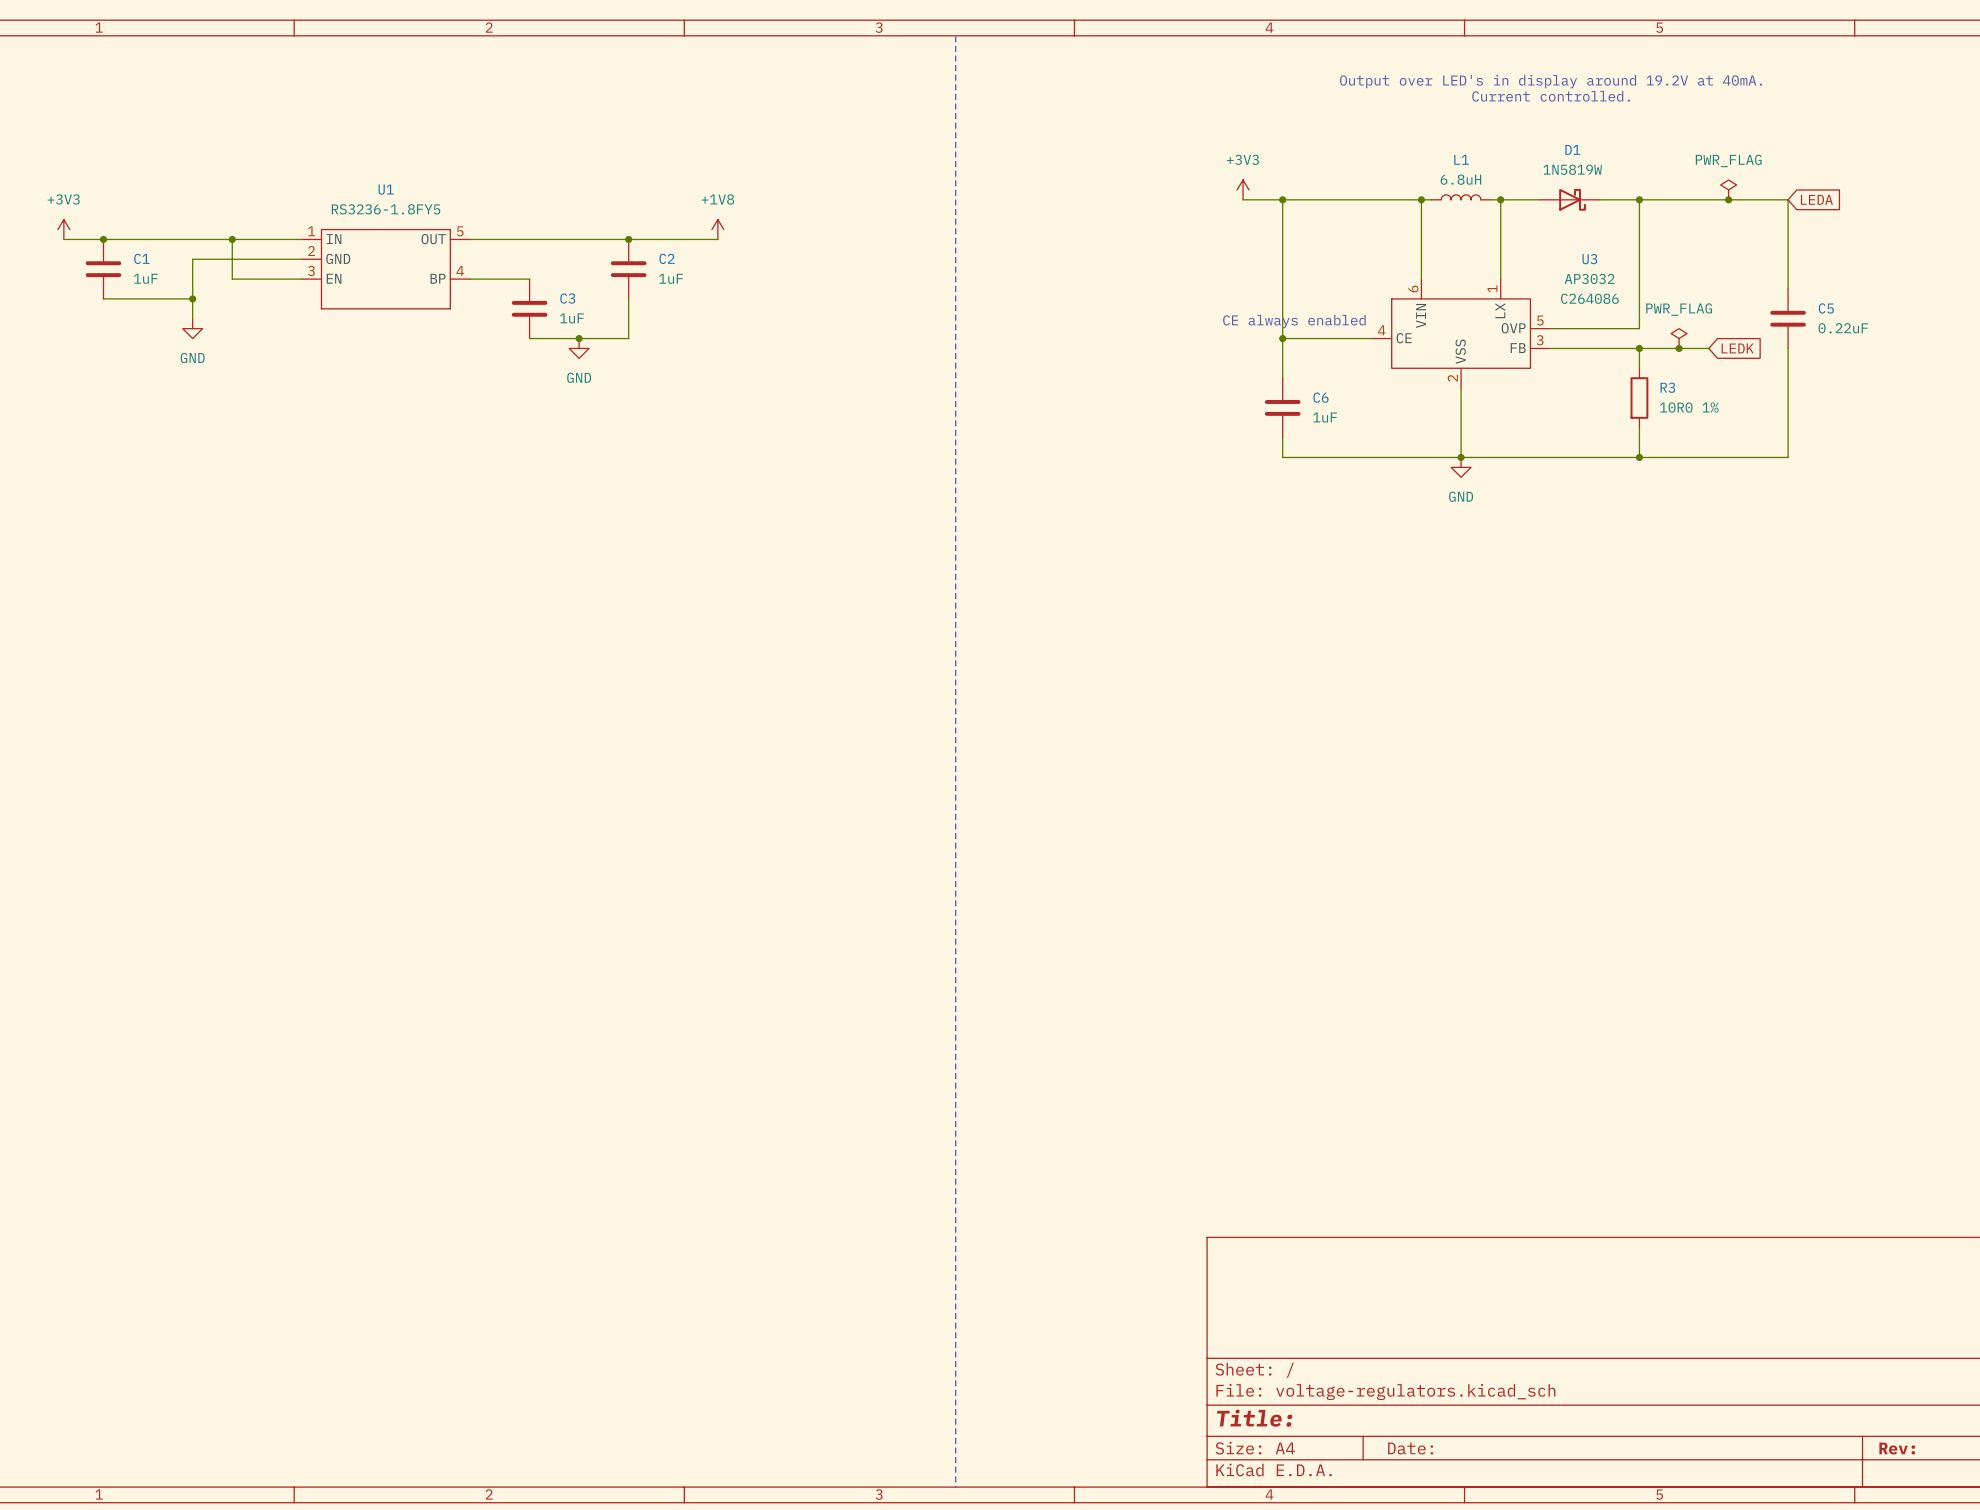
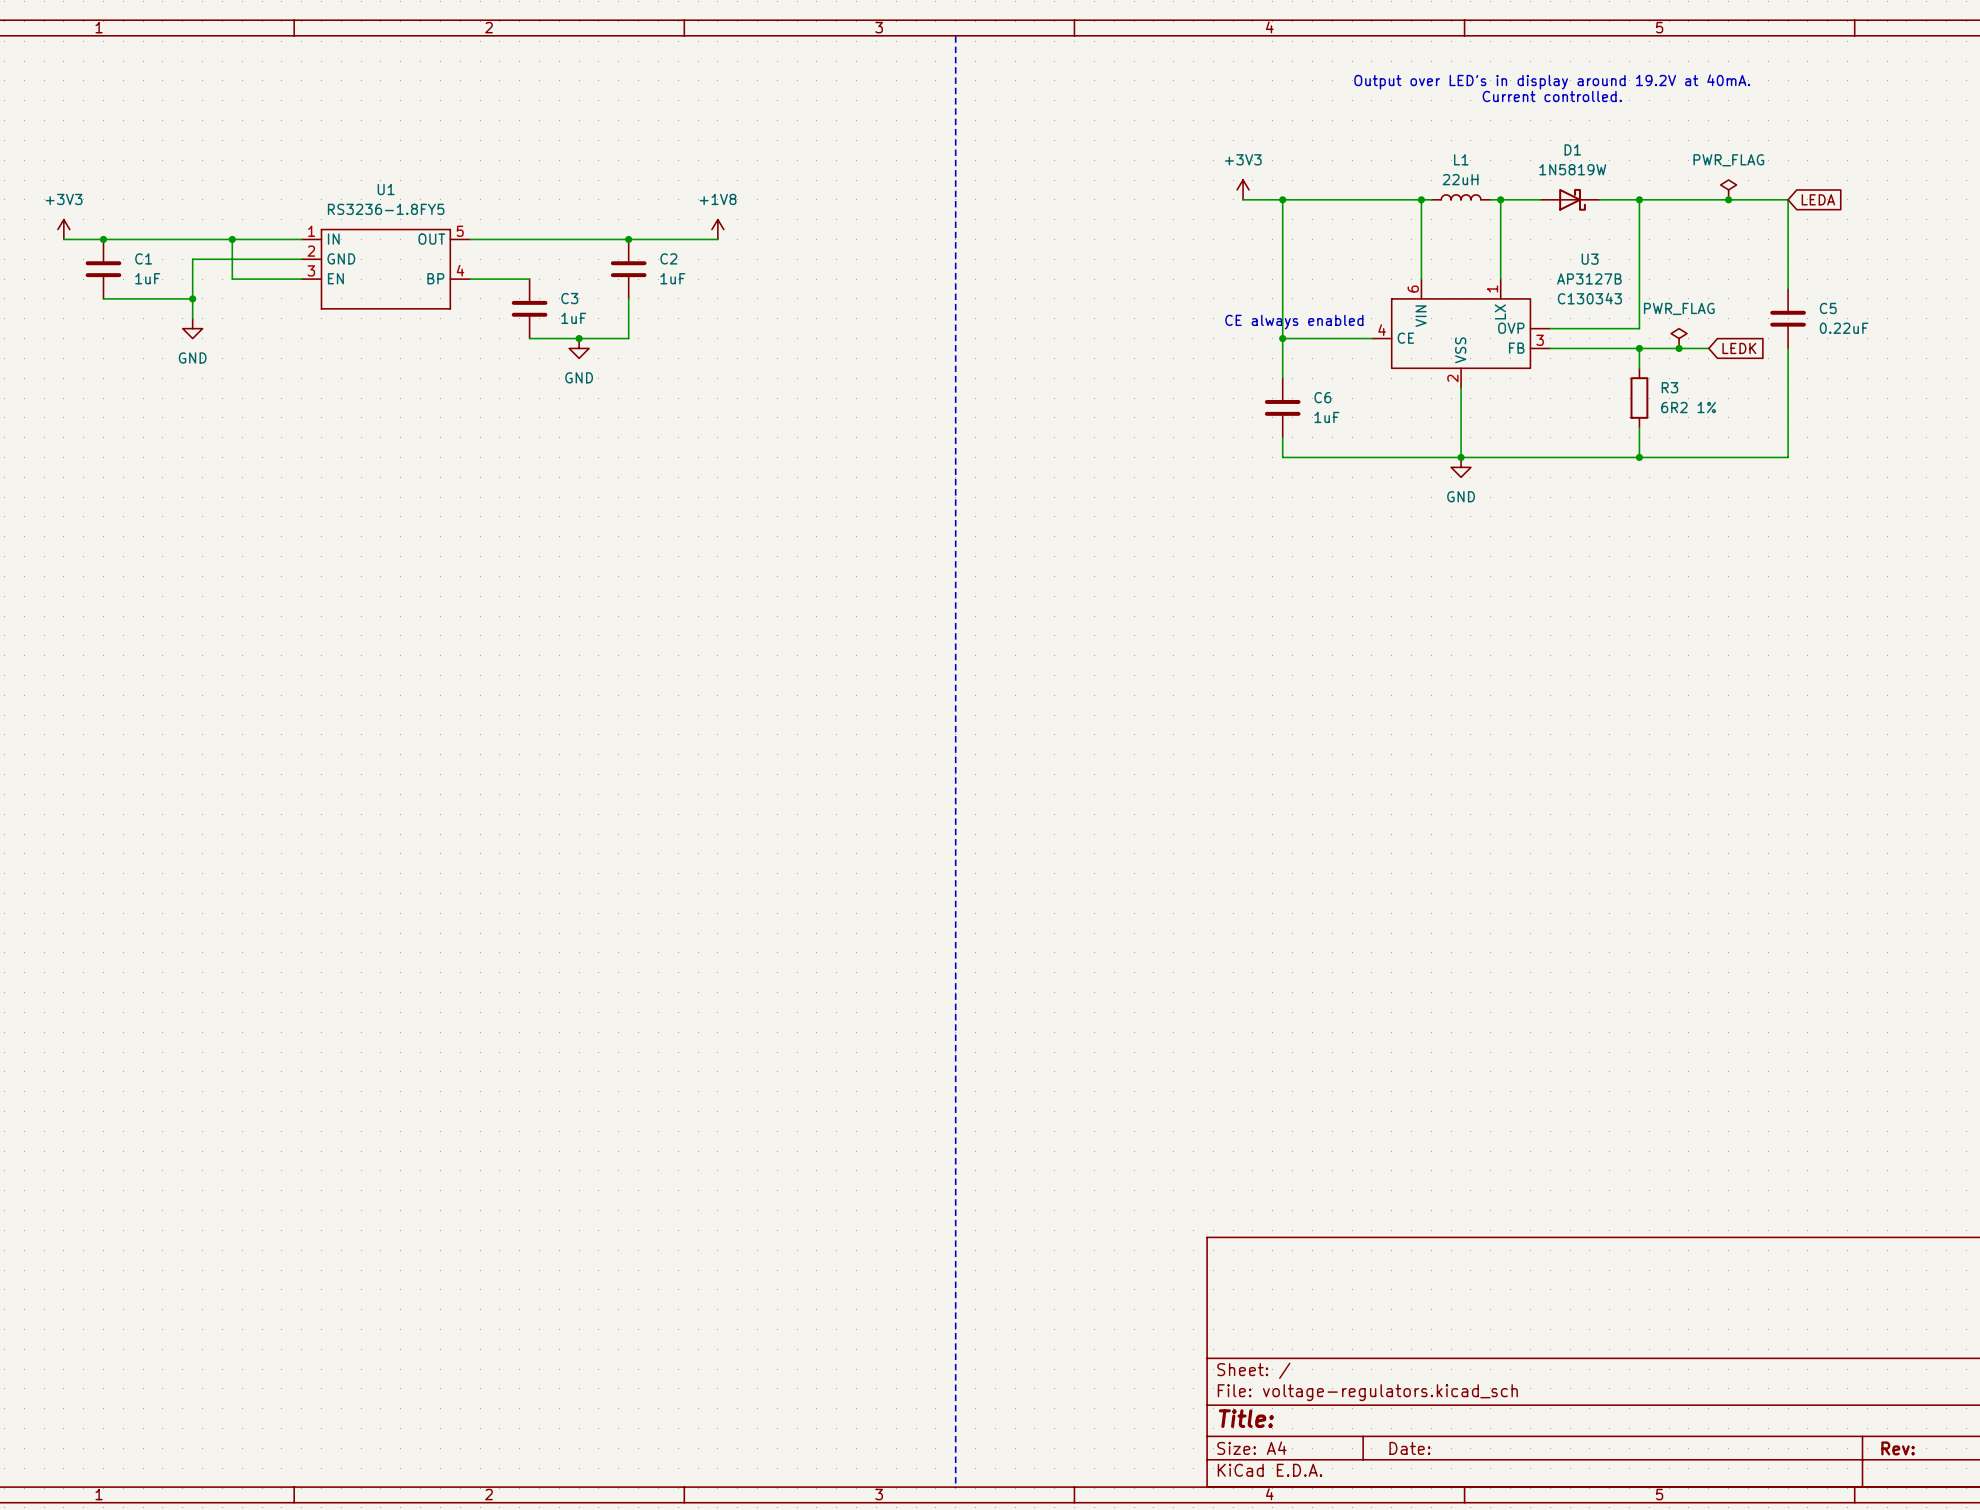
L1 value: 6.8uH (1460, 179) -> 22uH (1460, 179)
U3 value: AP3032 (1589, 278) -> AP3127B (1589, 278)
U3 text: C264086 (1589, 298) -> C130343 (1589, 298)
U3 pin number: 5 (1540, 320) -> none
R3 value: 10R0 1% (1689, 407) -> 6R2 1% (1688, 407)

